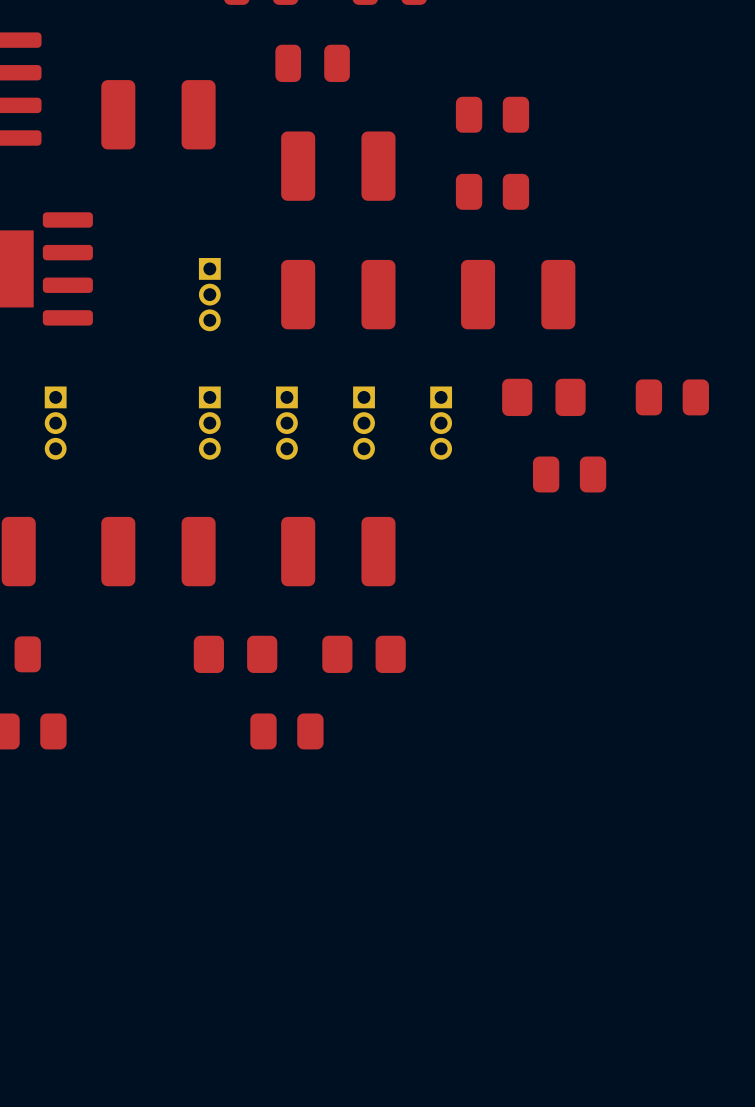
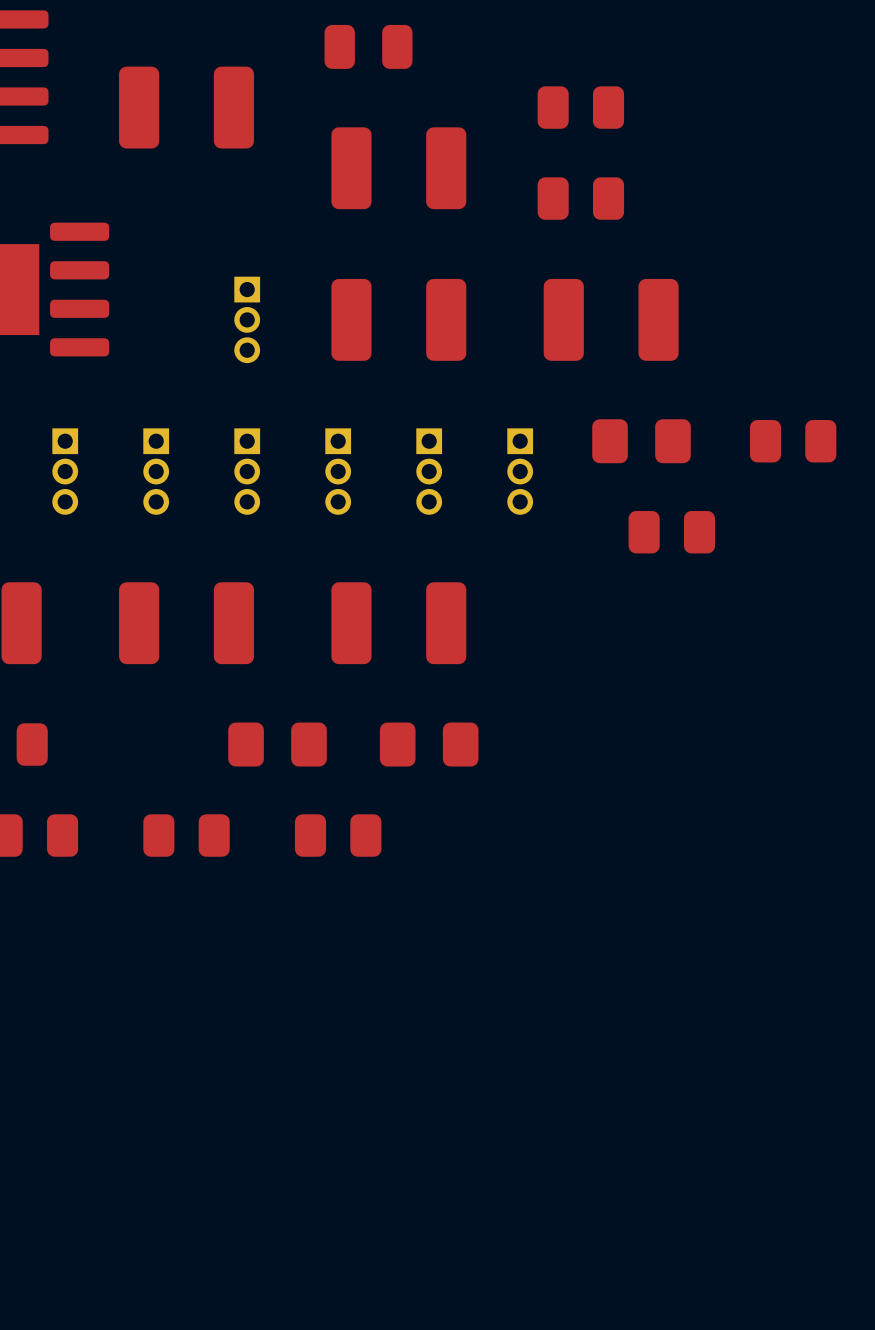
part: none -> (156, 471)
part: none -> (186, 835)

